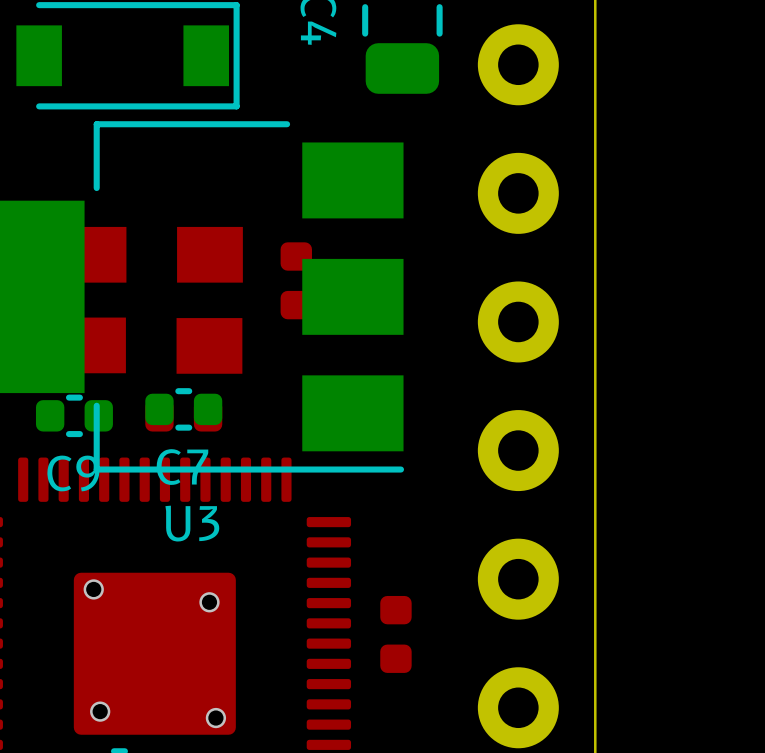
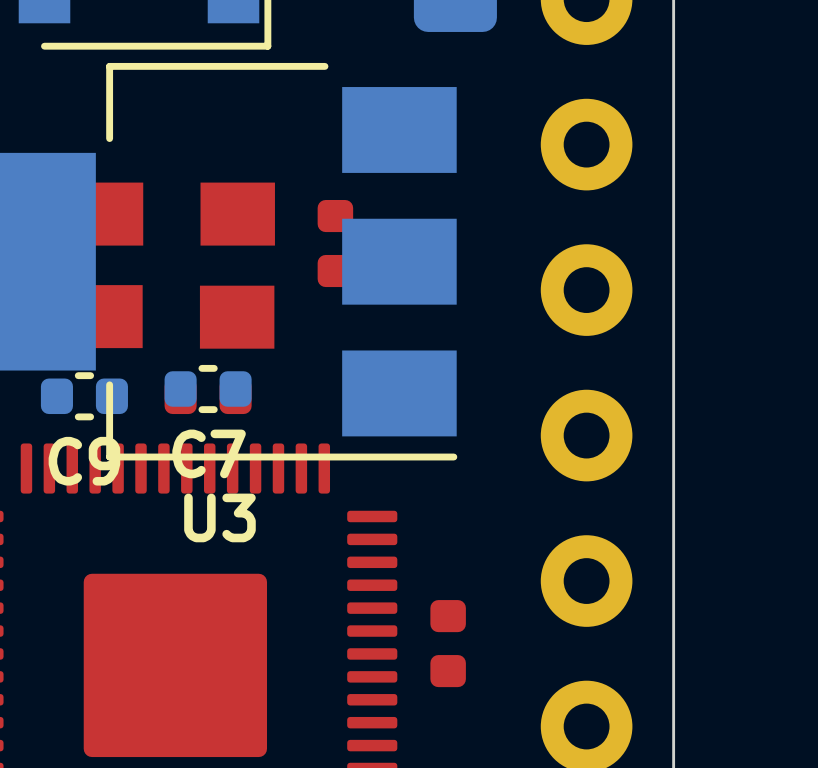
via: (93, 589) -> none
via: (209, 602) -> none
via: (100, 711) -> none
via: (215, 718) -> none

